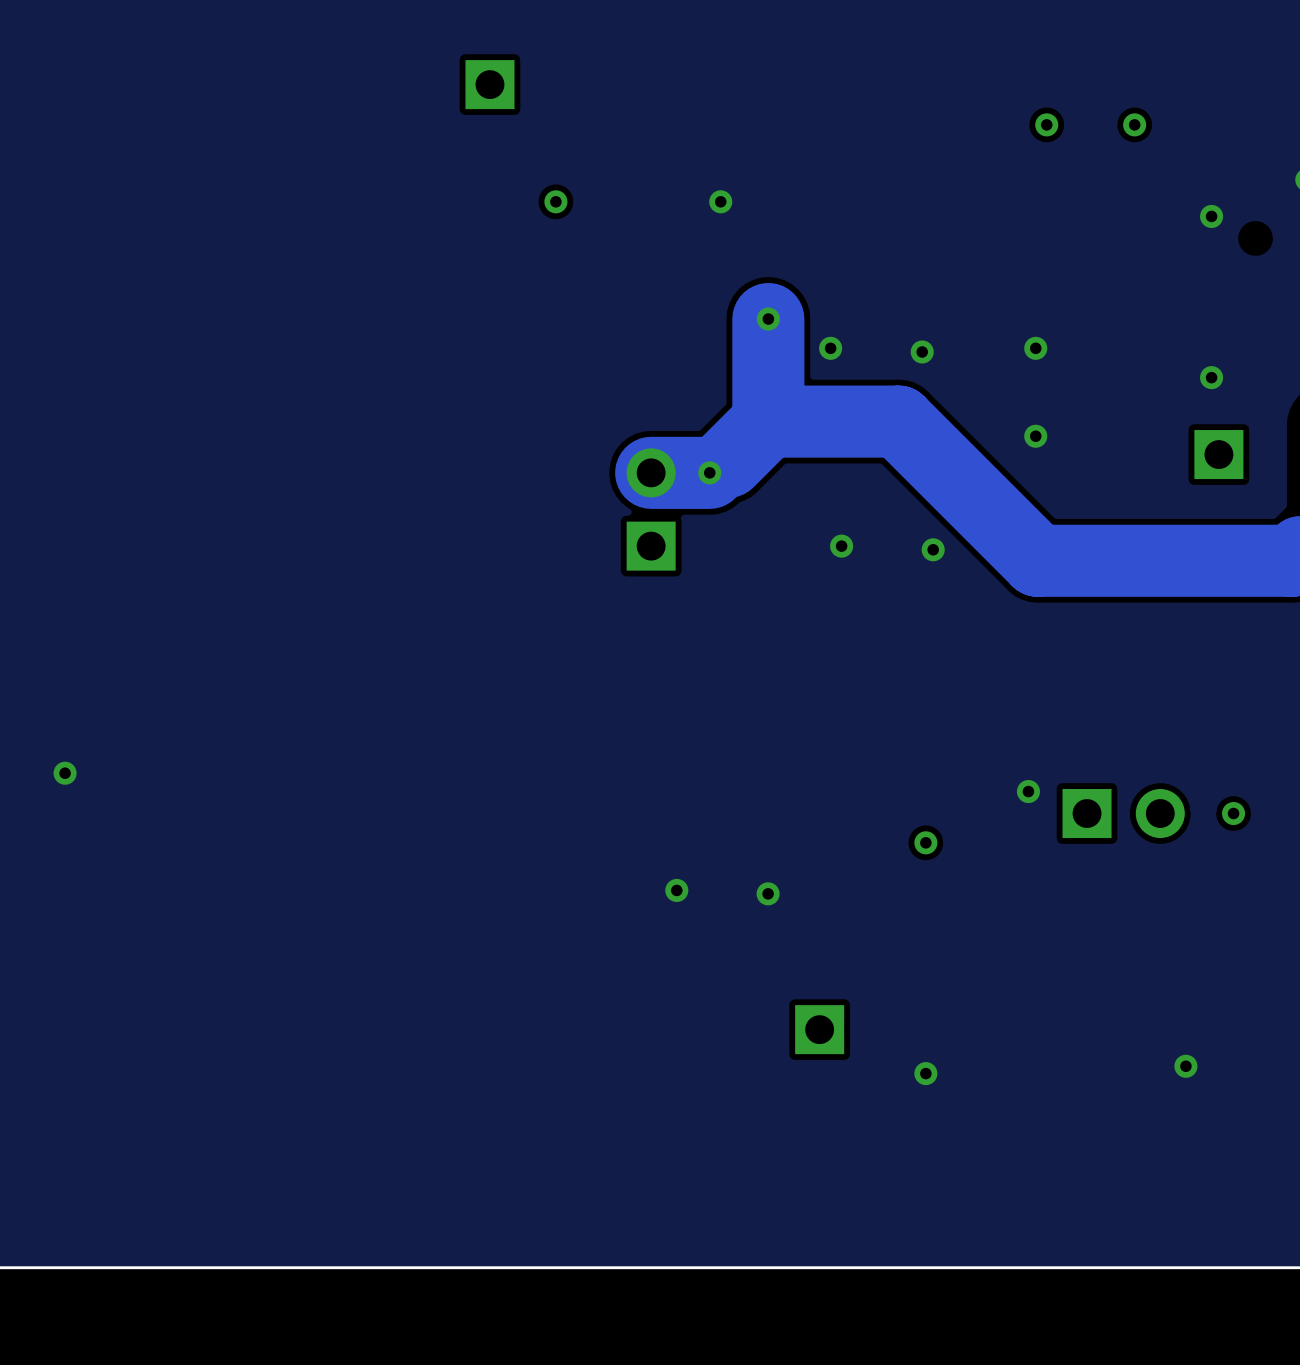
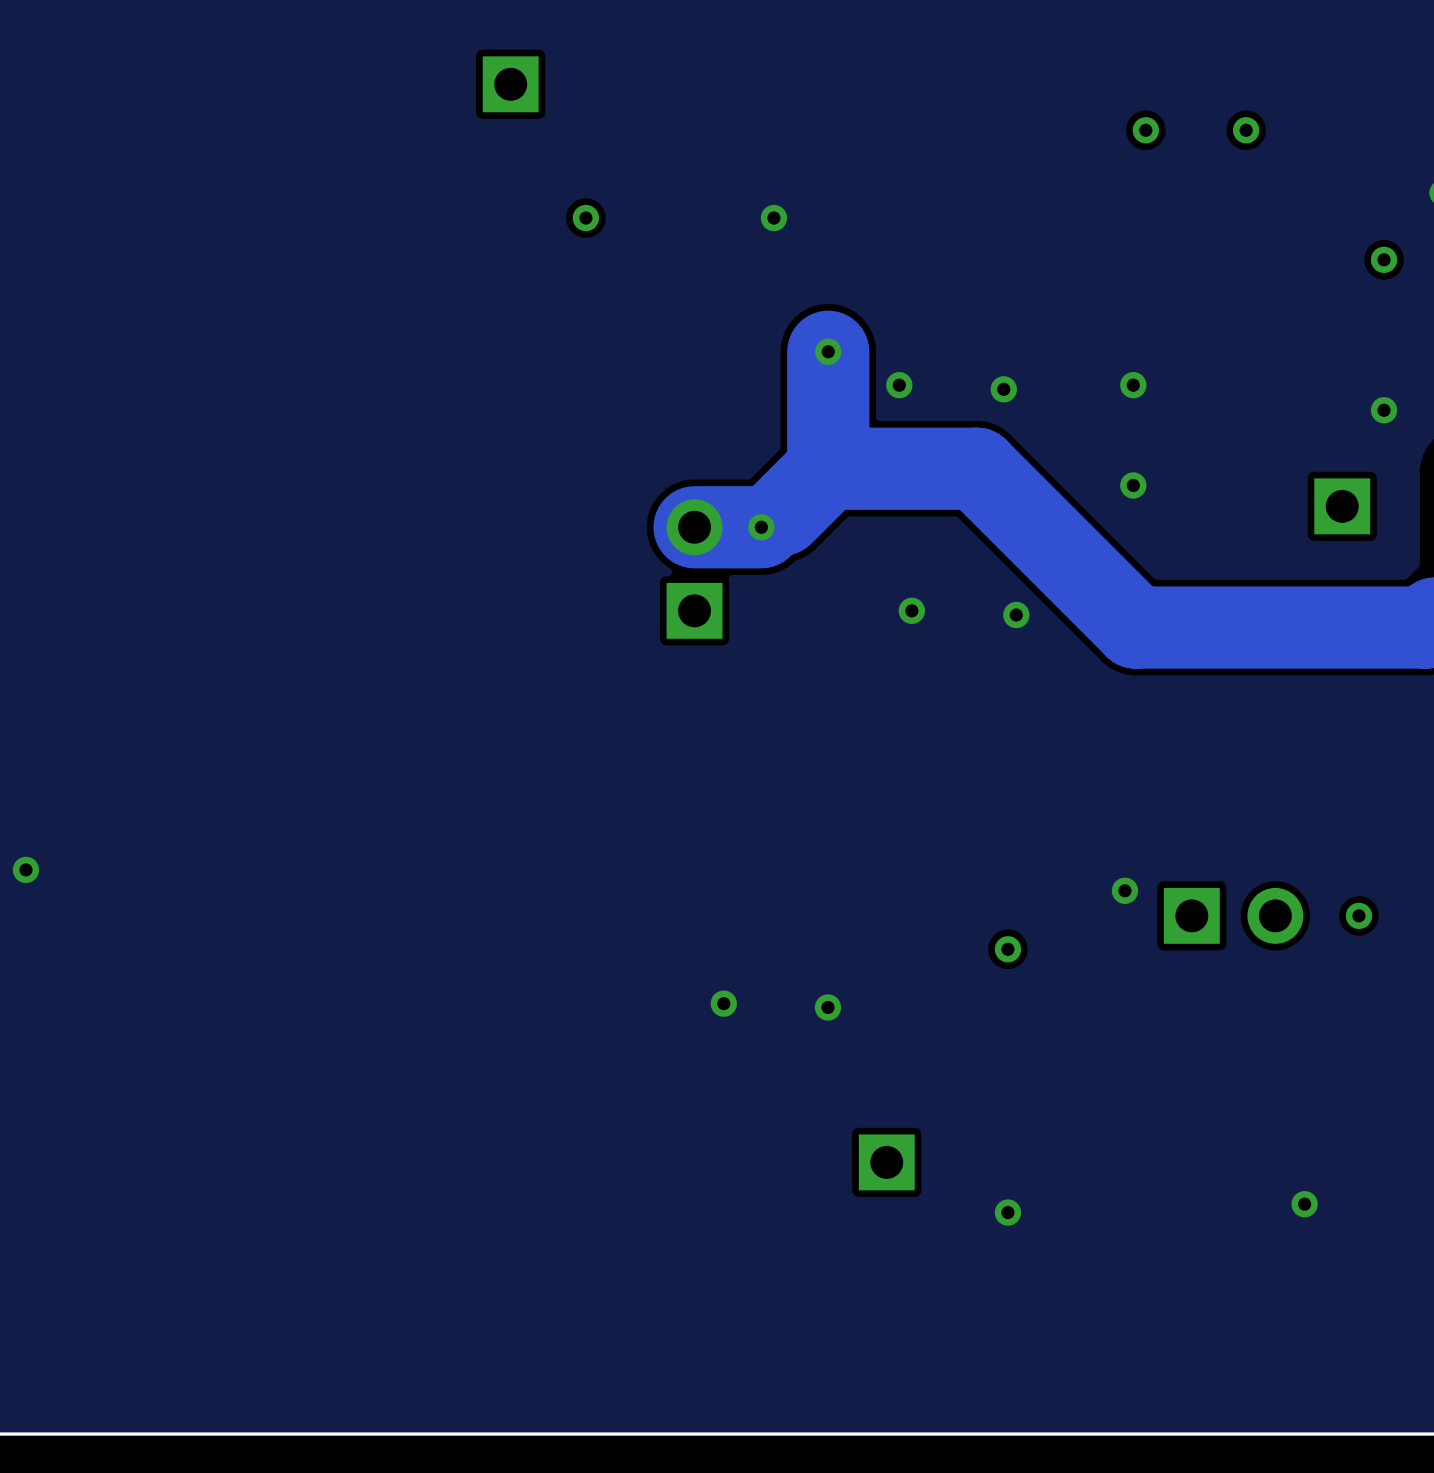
via position: (1211, 216) -> (1384, 259)
via position: (1211, 377) -> (1384, 410)

